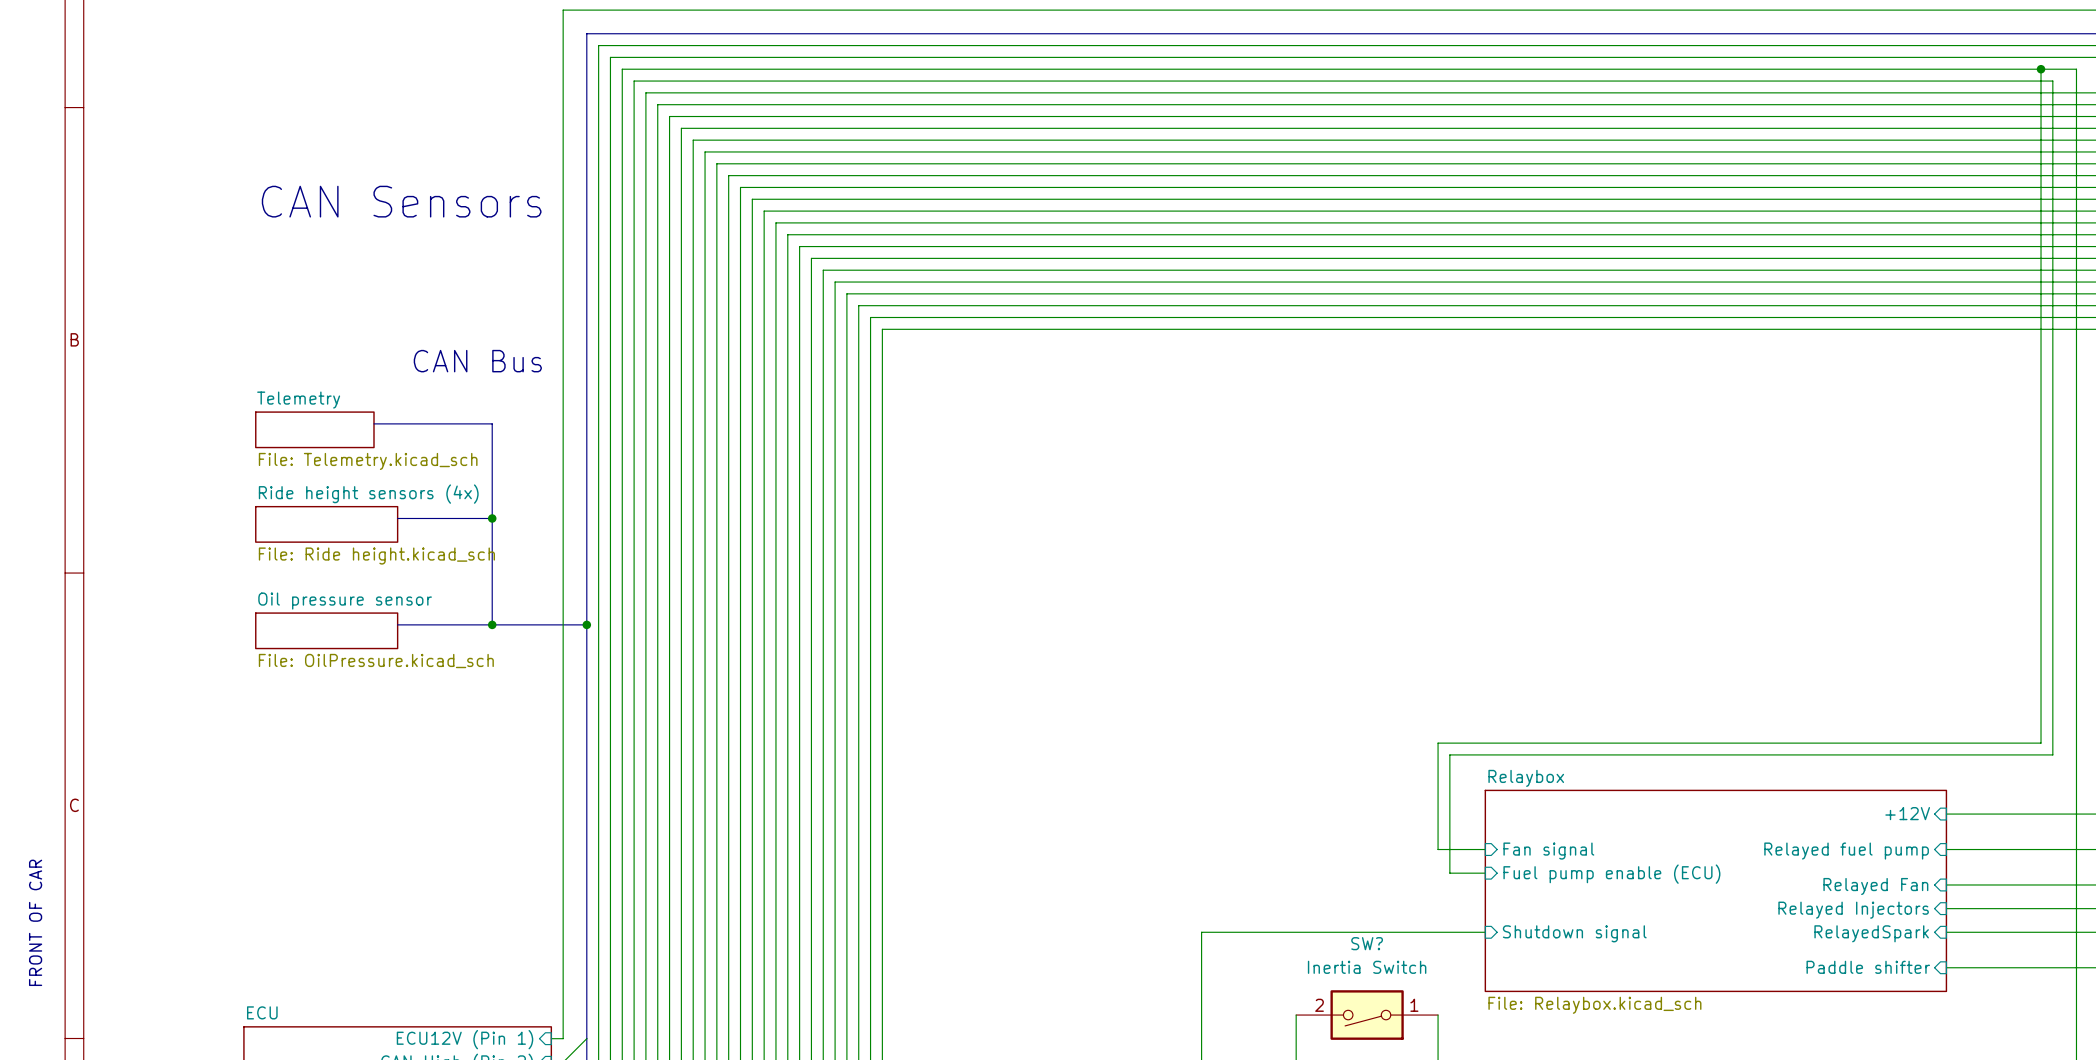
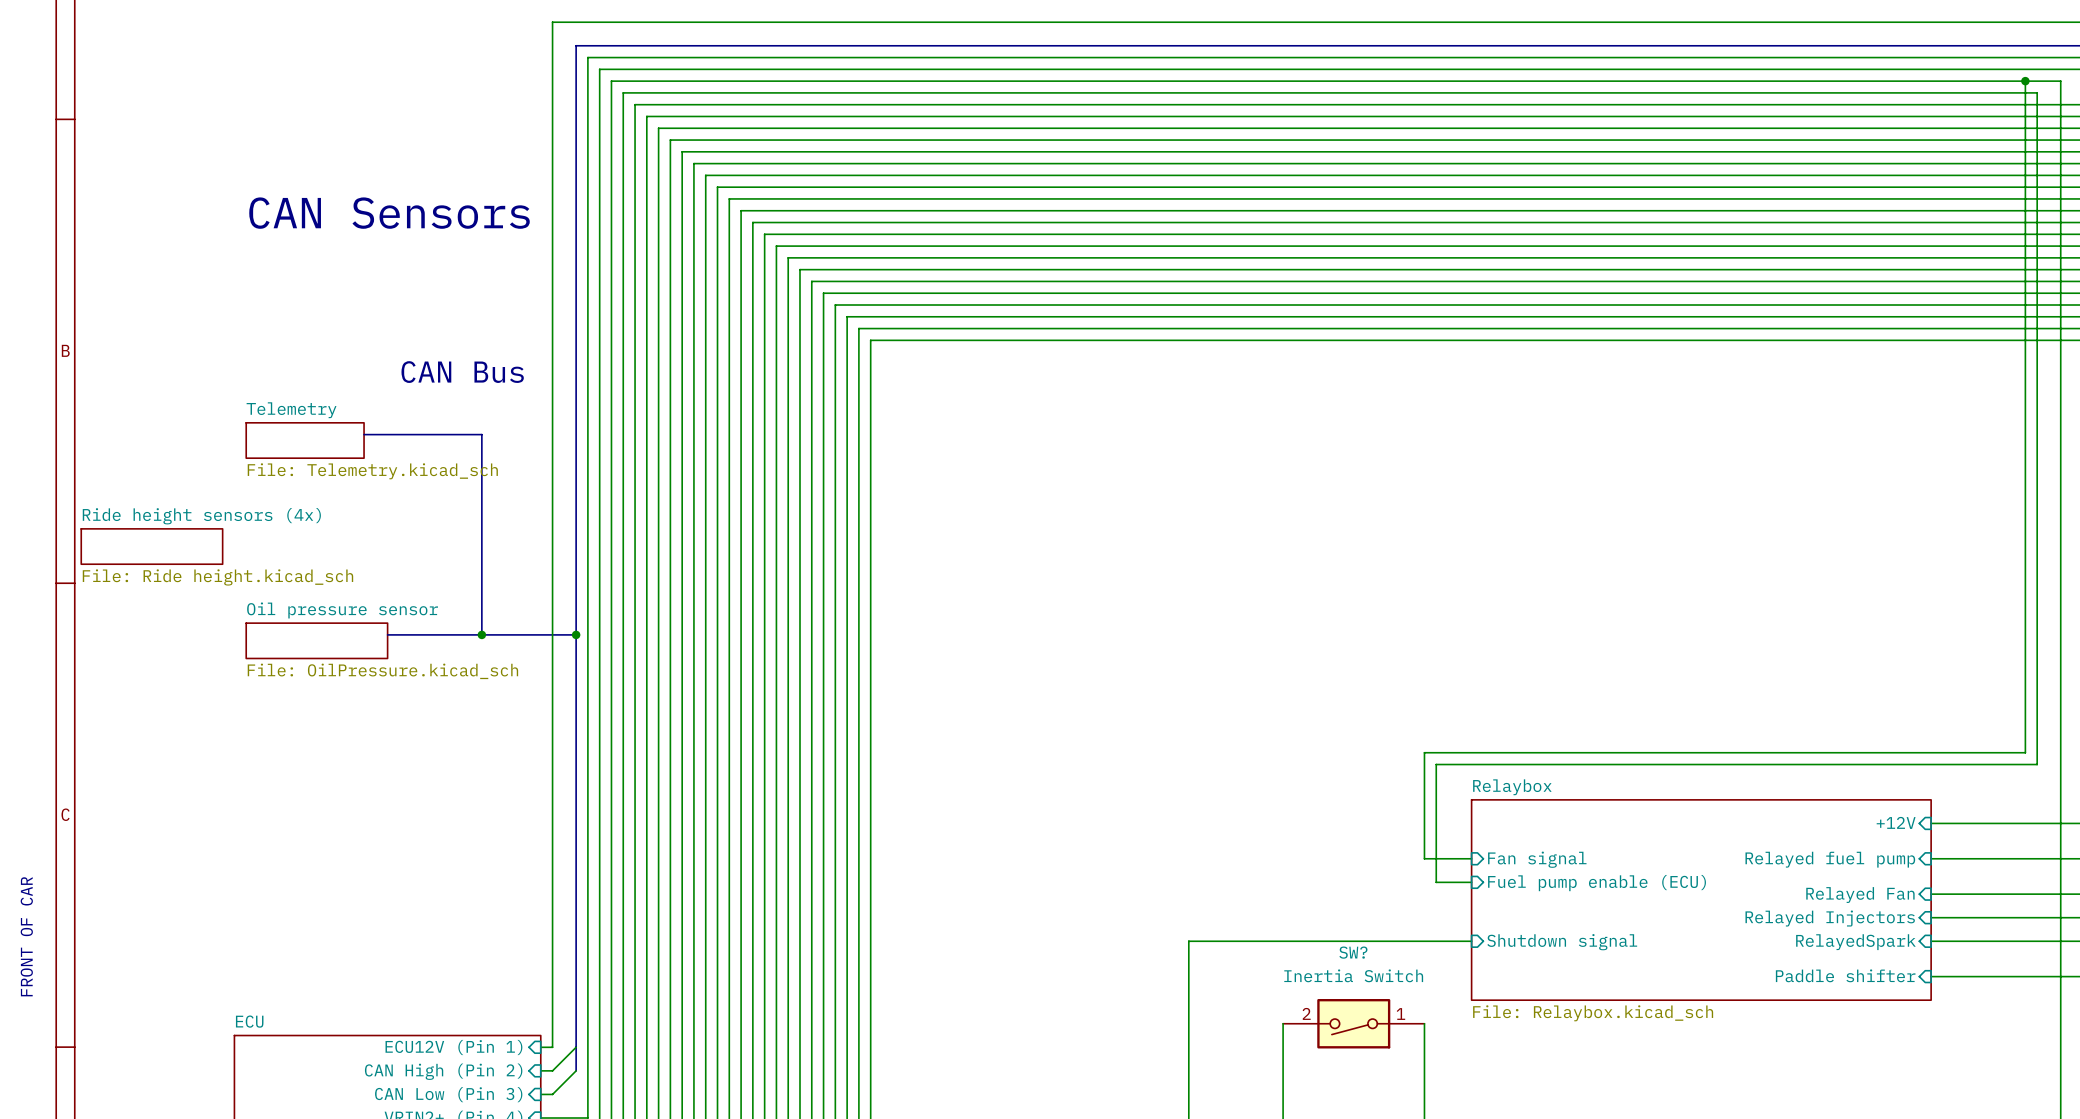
bus: (397, 518) (492, 518) -> none
junction: (492, 518) -> none
sheet Ride height sensors (4x) position: (326, 524) -> (151, 546)

